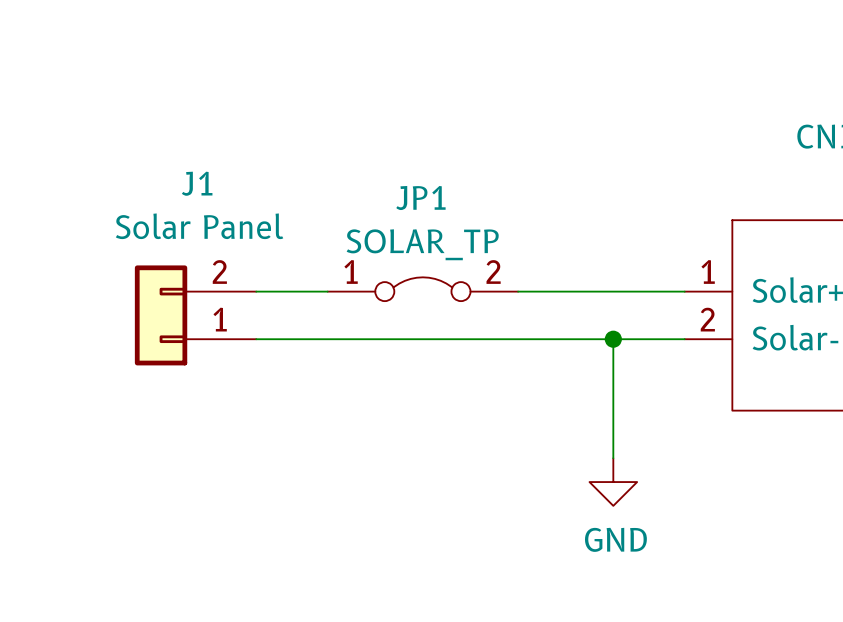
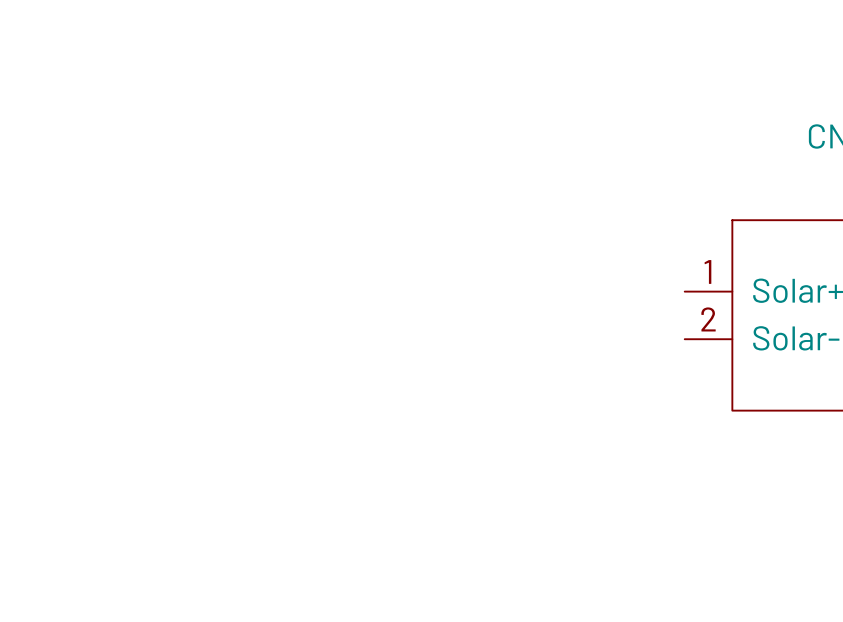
JP1: SOLAR_TP (422, 289) -> none
wire: (256, 291) (327, 291) -> none
wire: (518, 291) (684, 291) -> none
J1: Solar Panel (195, 315) -> none
wire: (256, 339) (684, 339) -> none
wire: (613, 339) (613, 458) -> none
junction: (613, 339) -> none
power symbol: GND (613, 482) -> none

